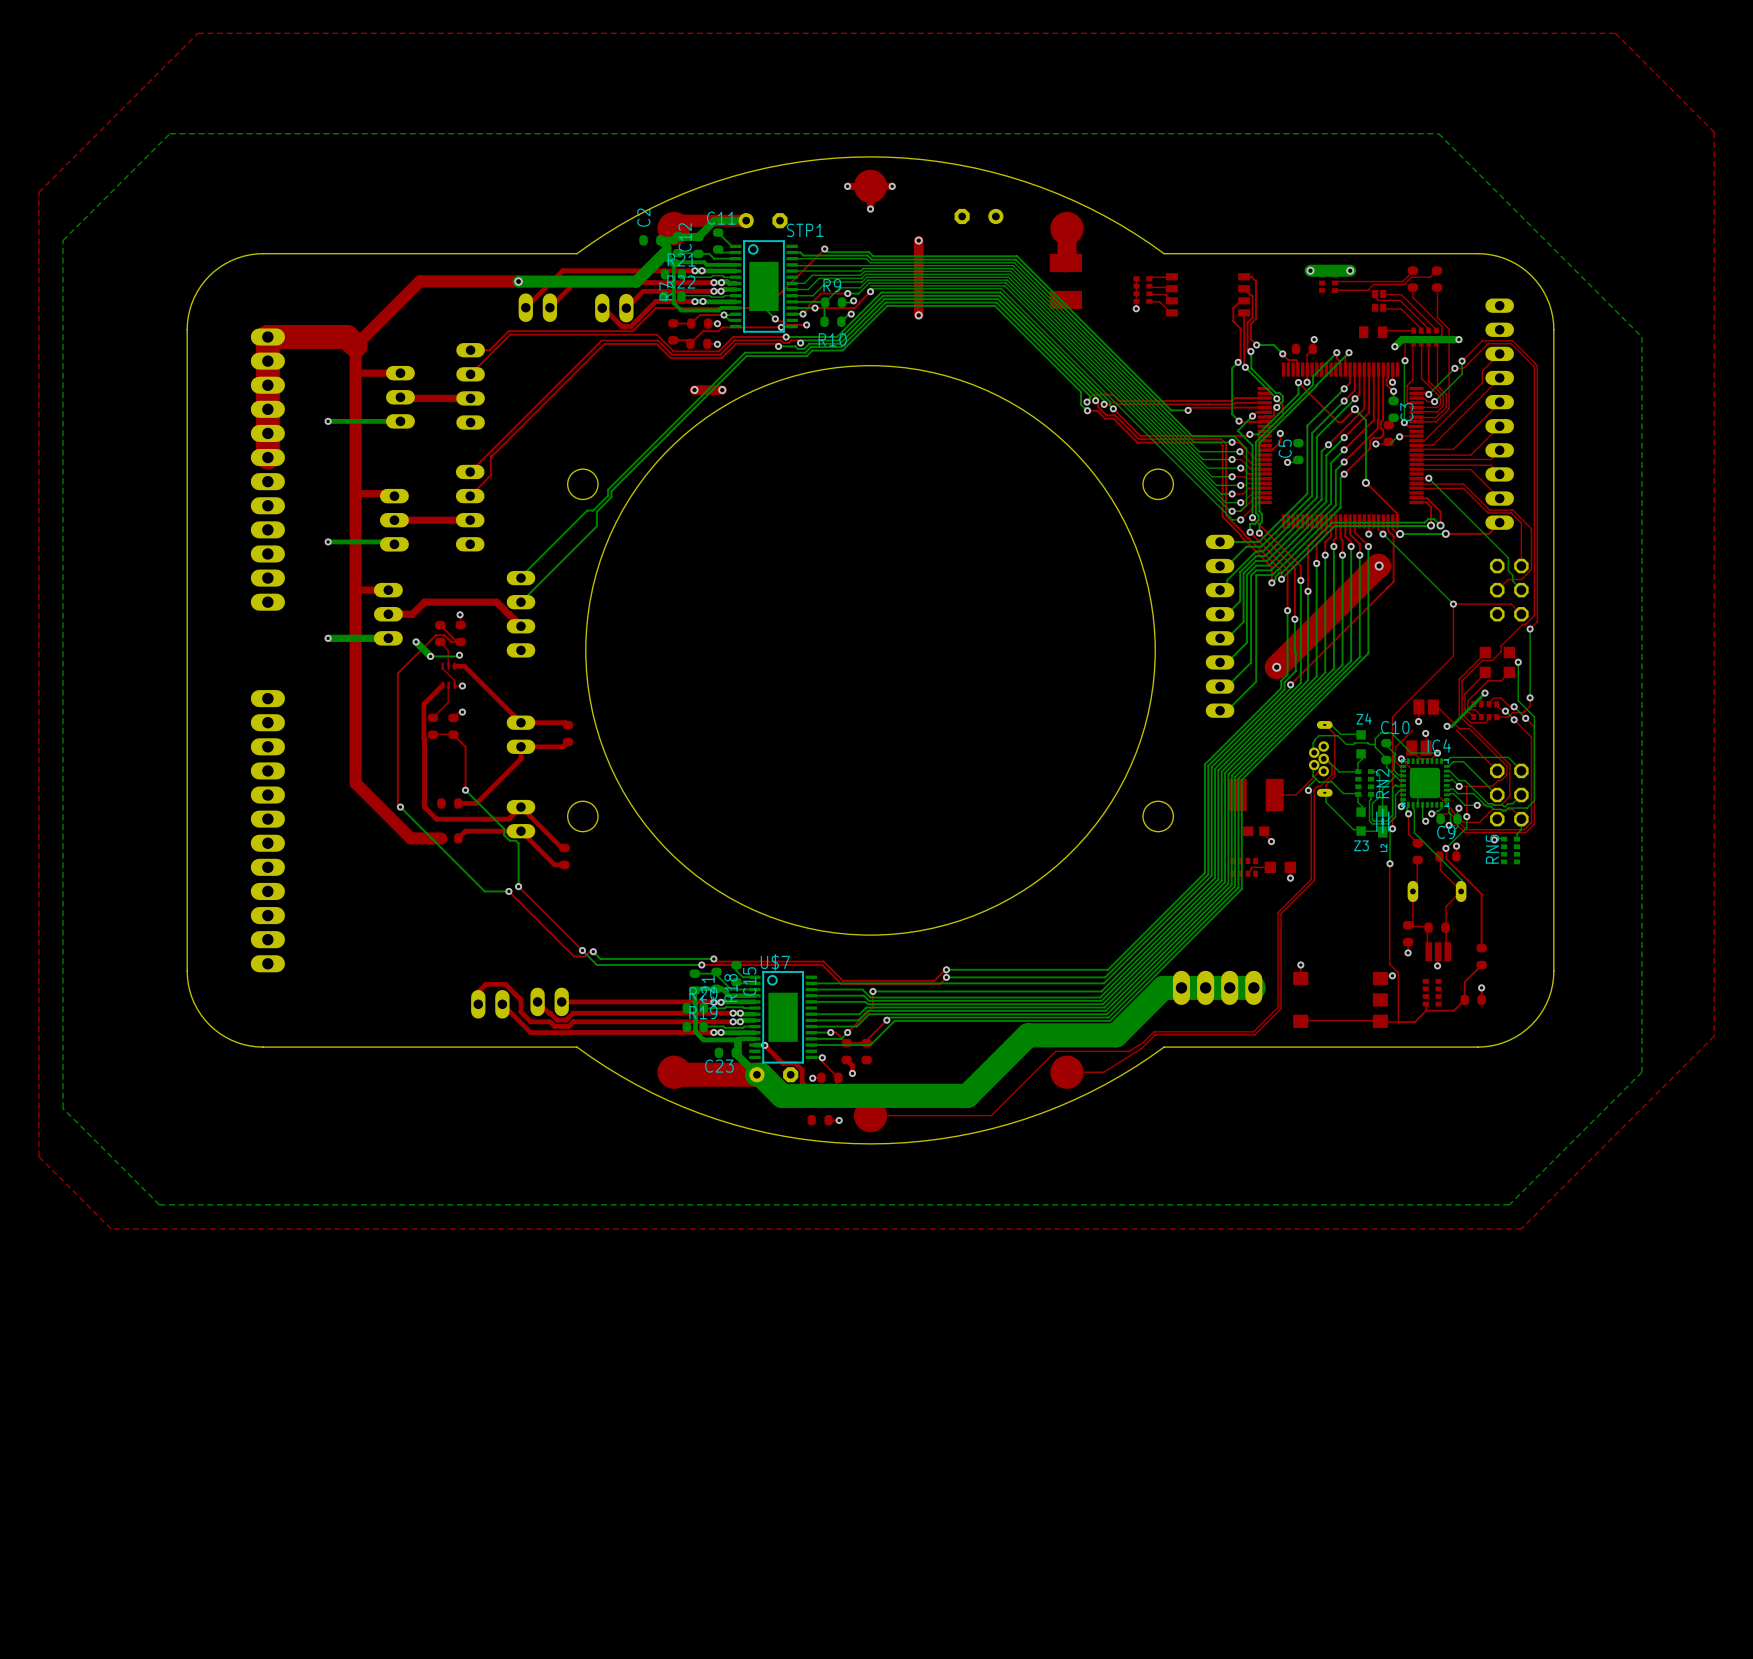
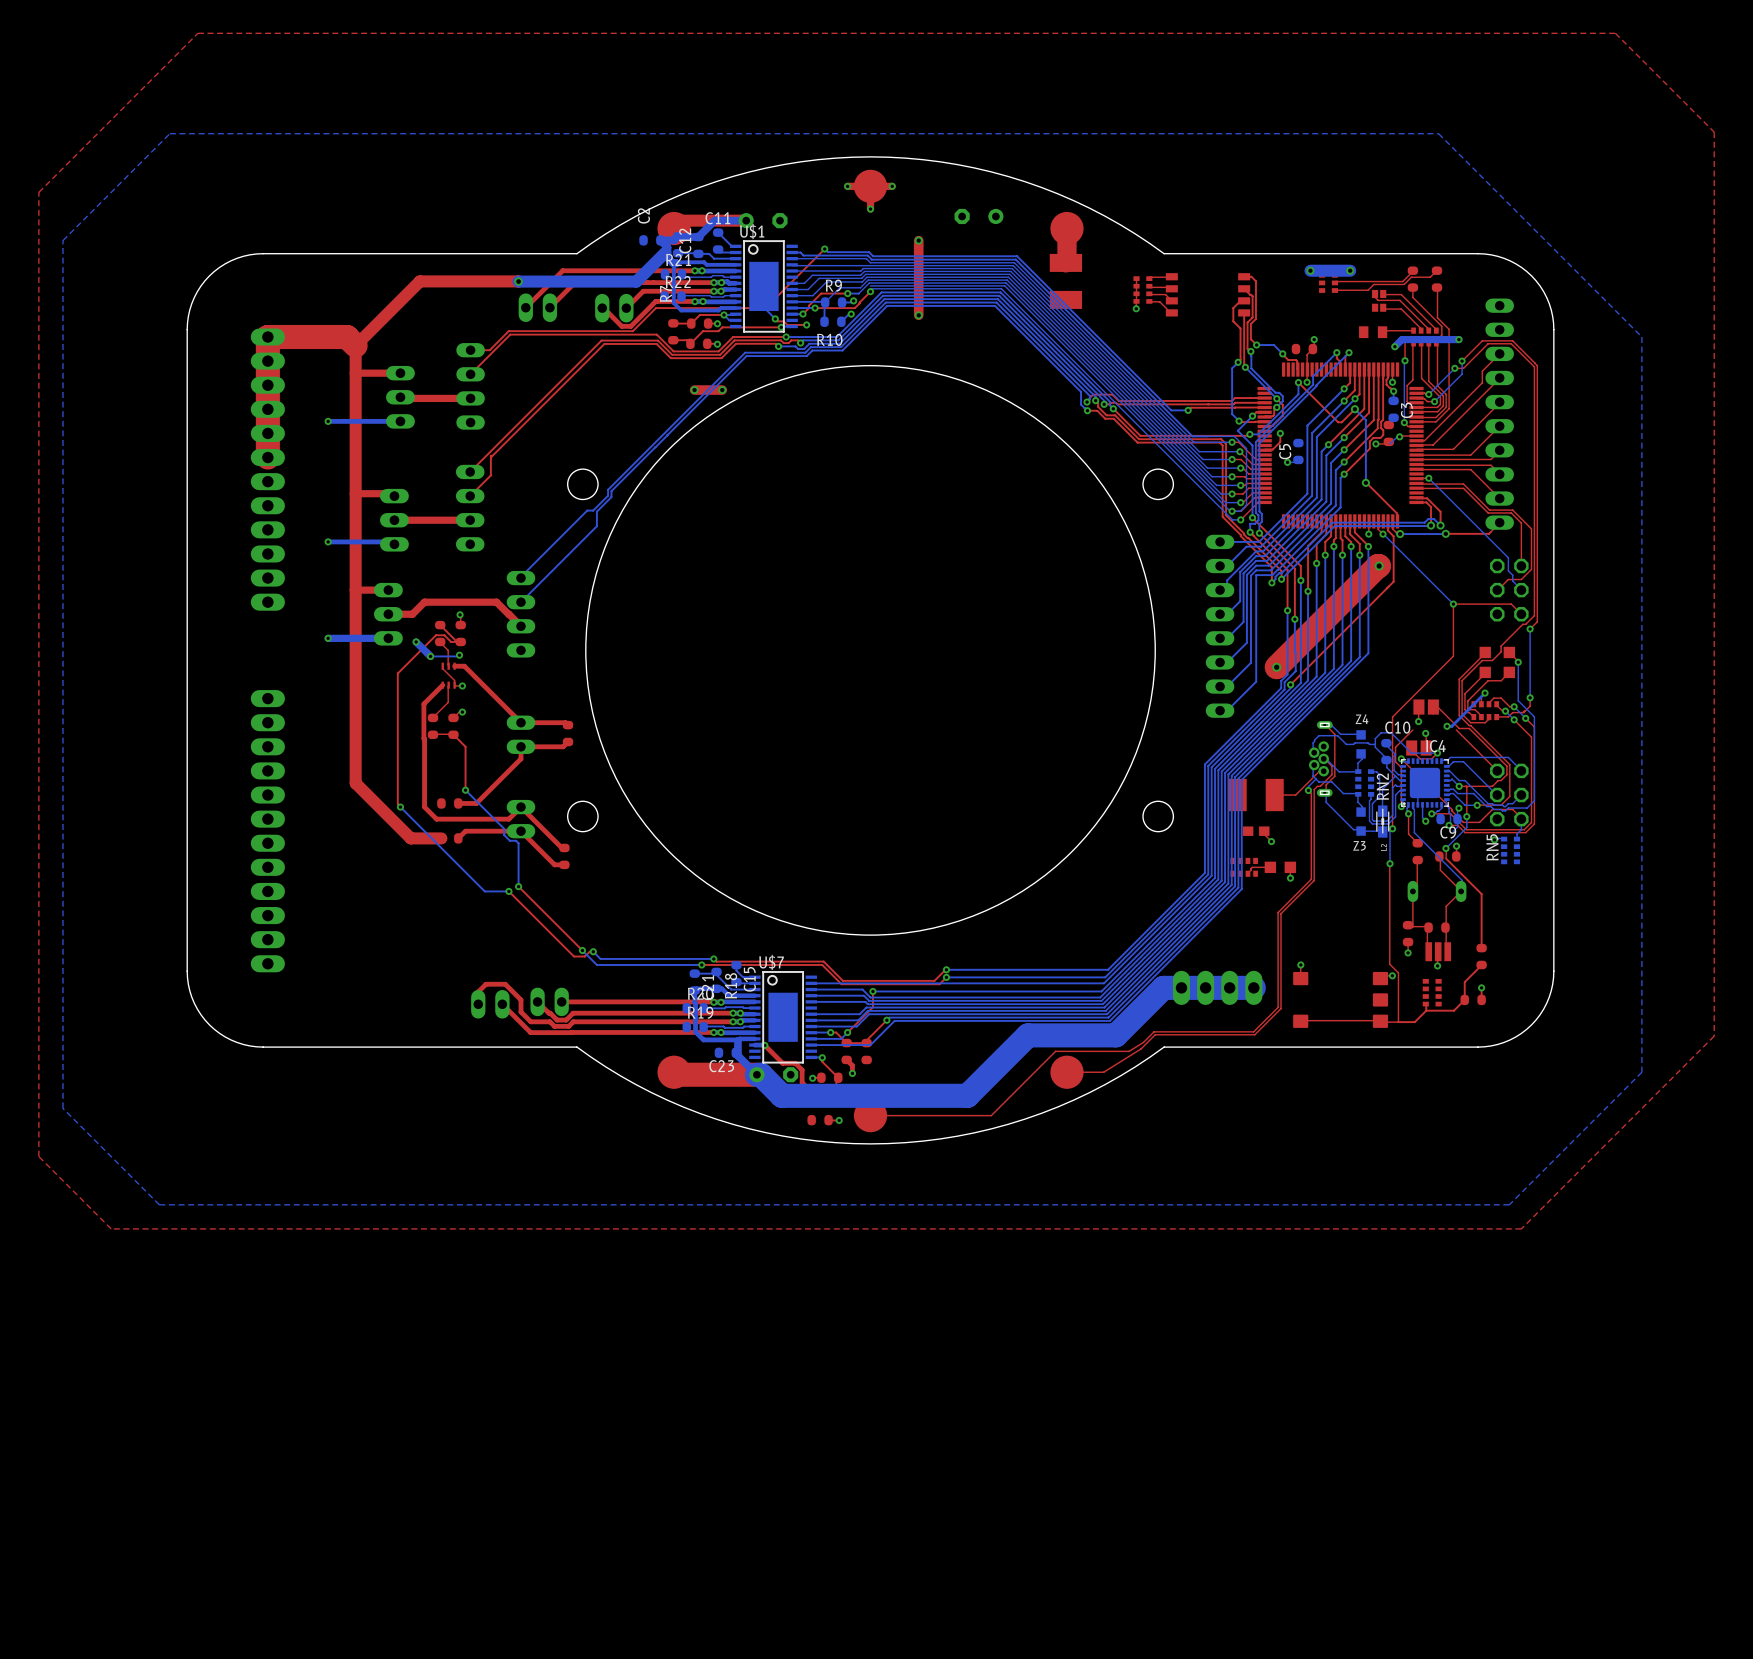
STP1 name: STP1 (805, 230) -> U$1 (752, 231)

